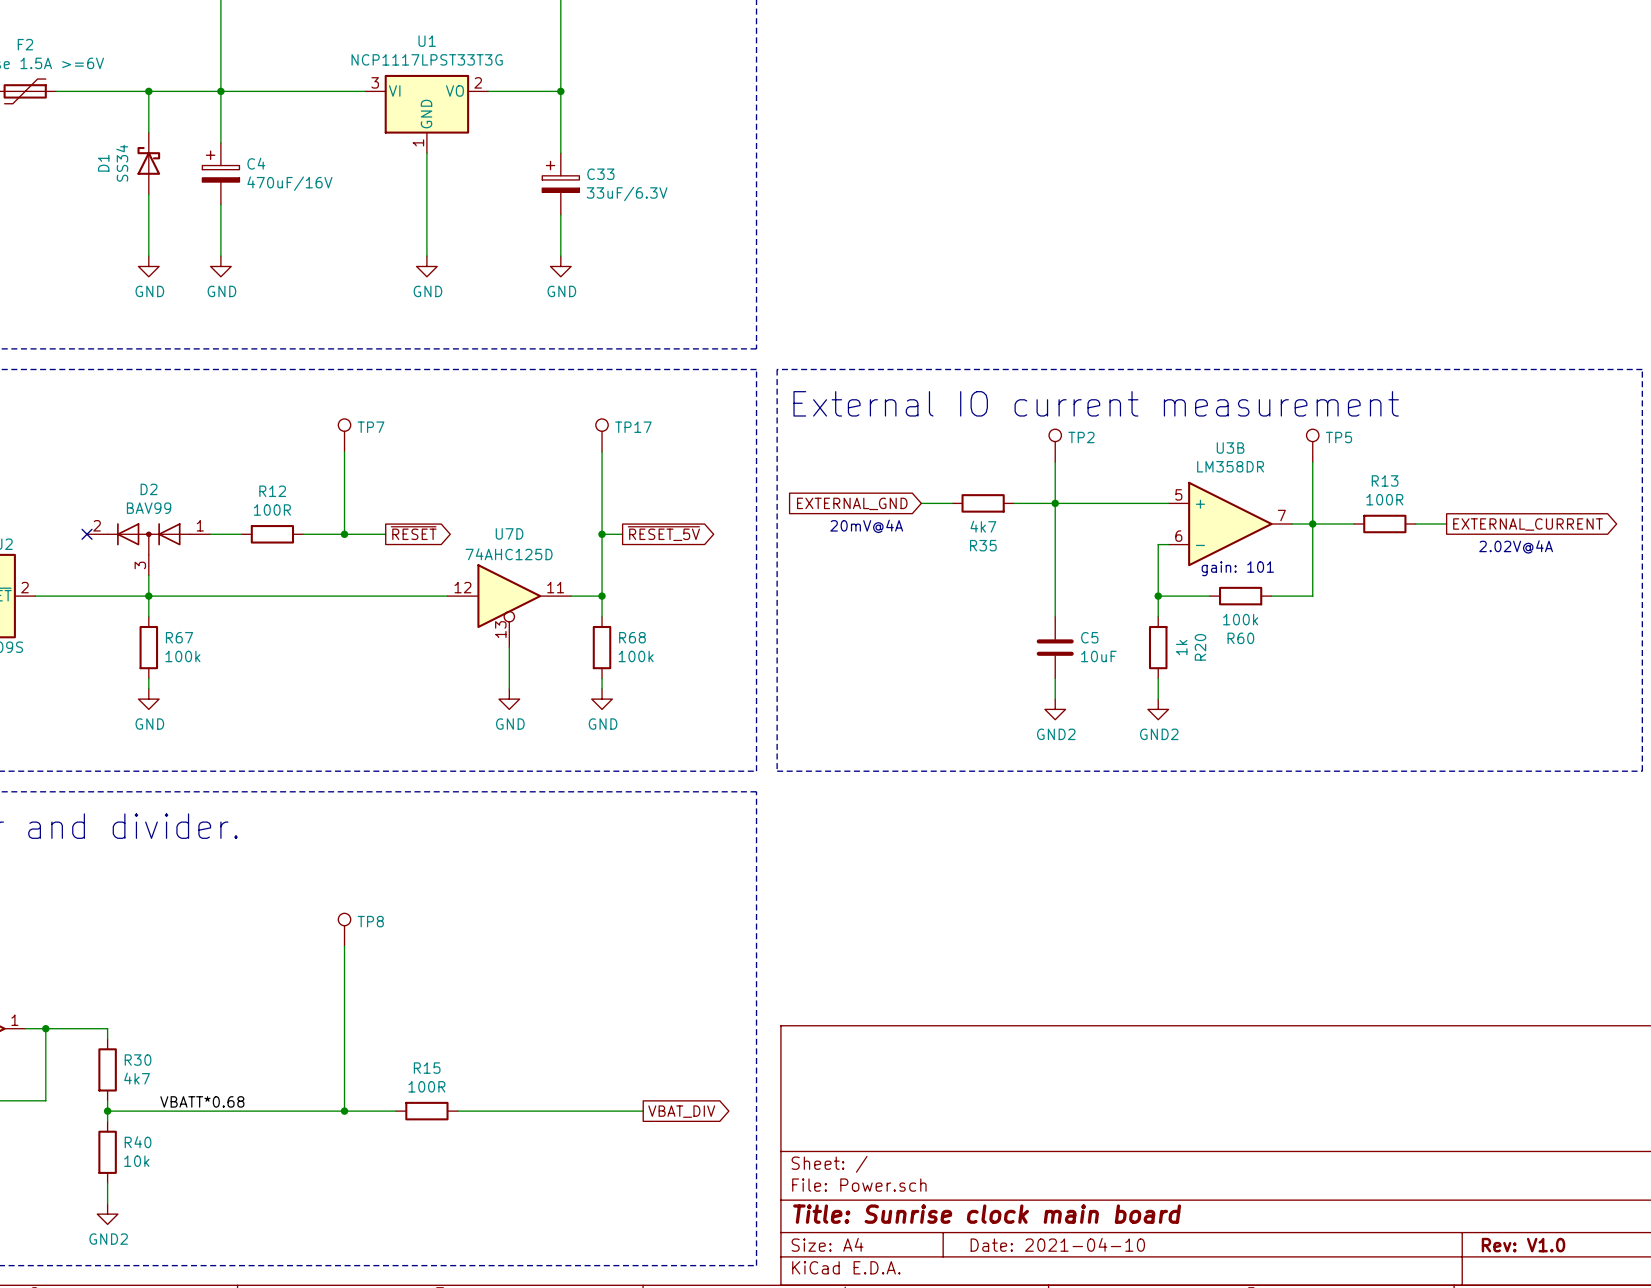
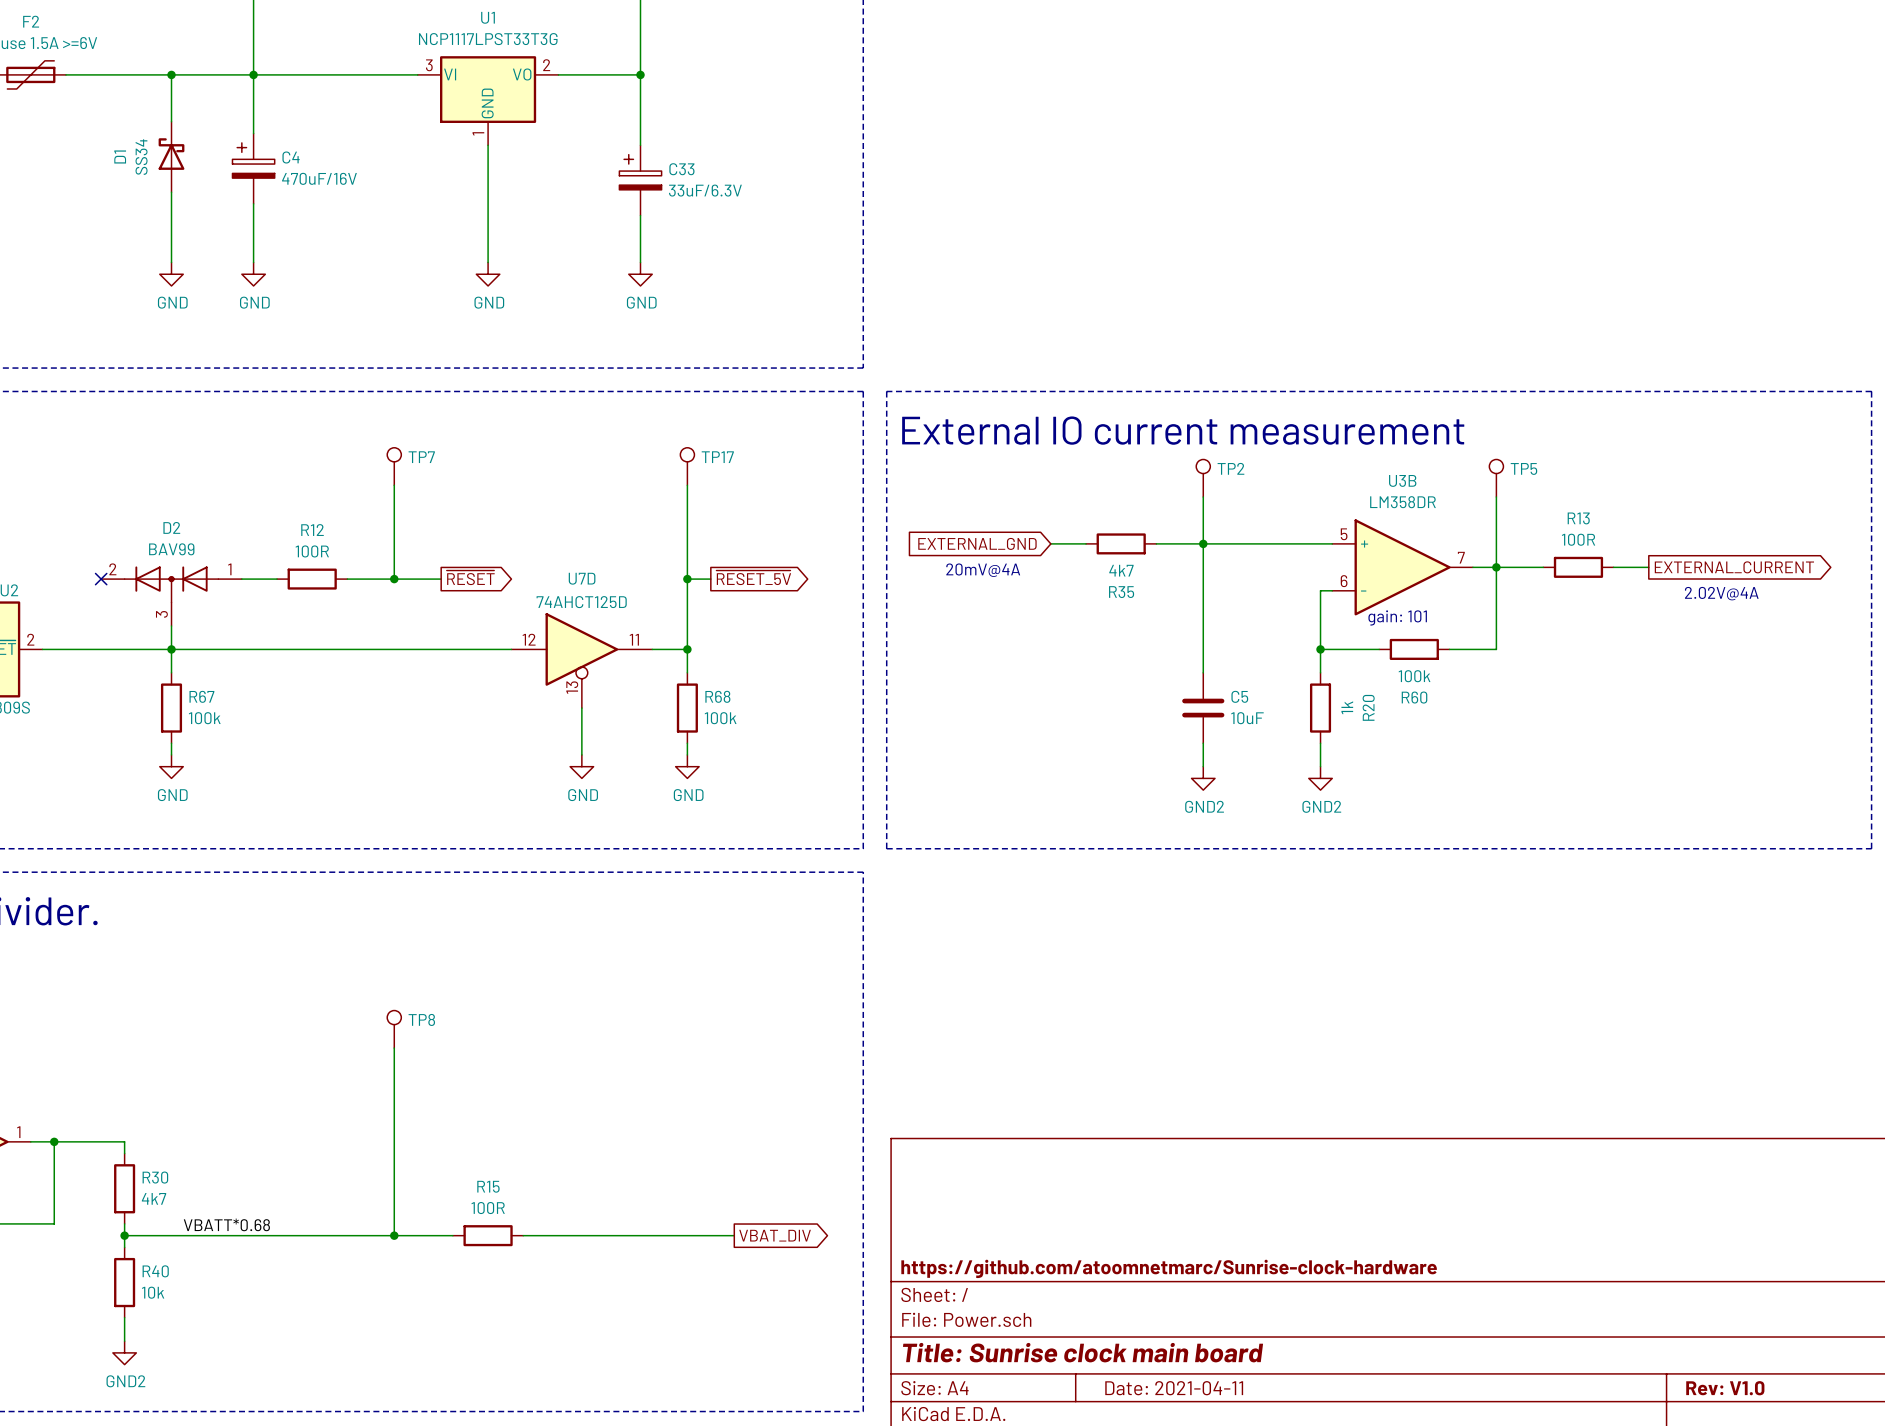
U7D value: 74AHC125D (509, 554) -> 74AHCT125D (581, 602)
title block: none -> https://github.com/atoomnetmarc/Sunrise-clock-hardware (1169, 1268)
title block: Date: 2021-04-10 (1057, 1244) -> Date: 2021-04-11 (1174, 1388)

